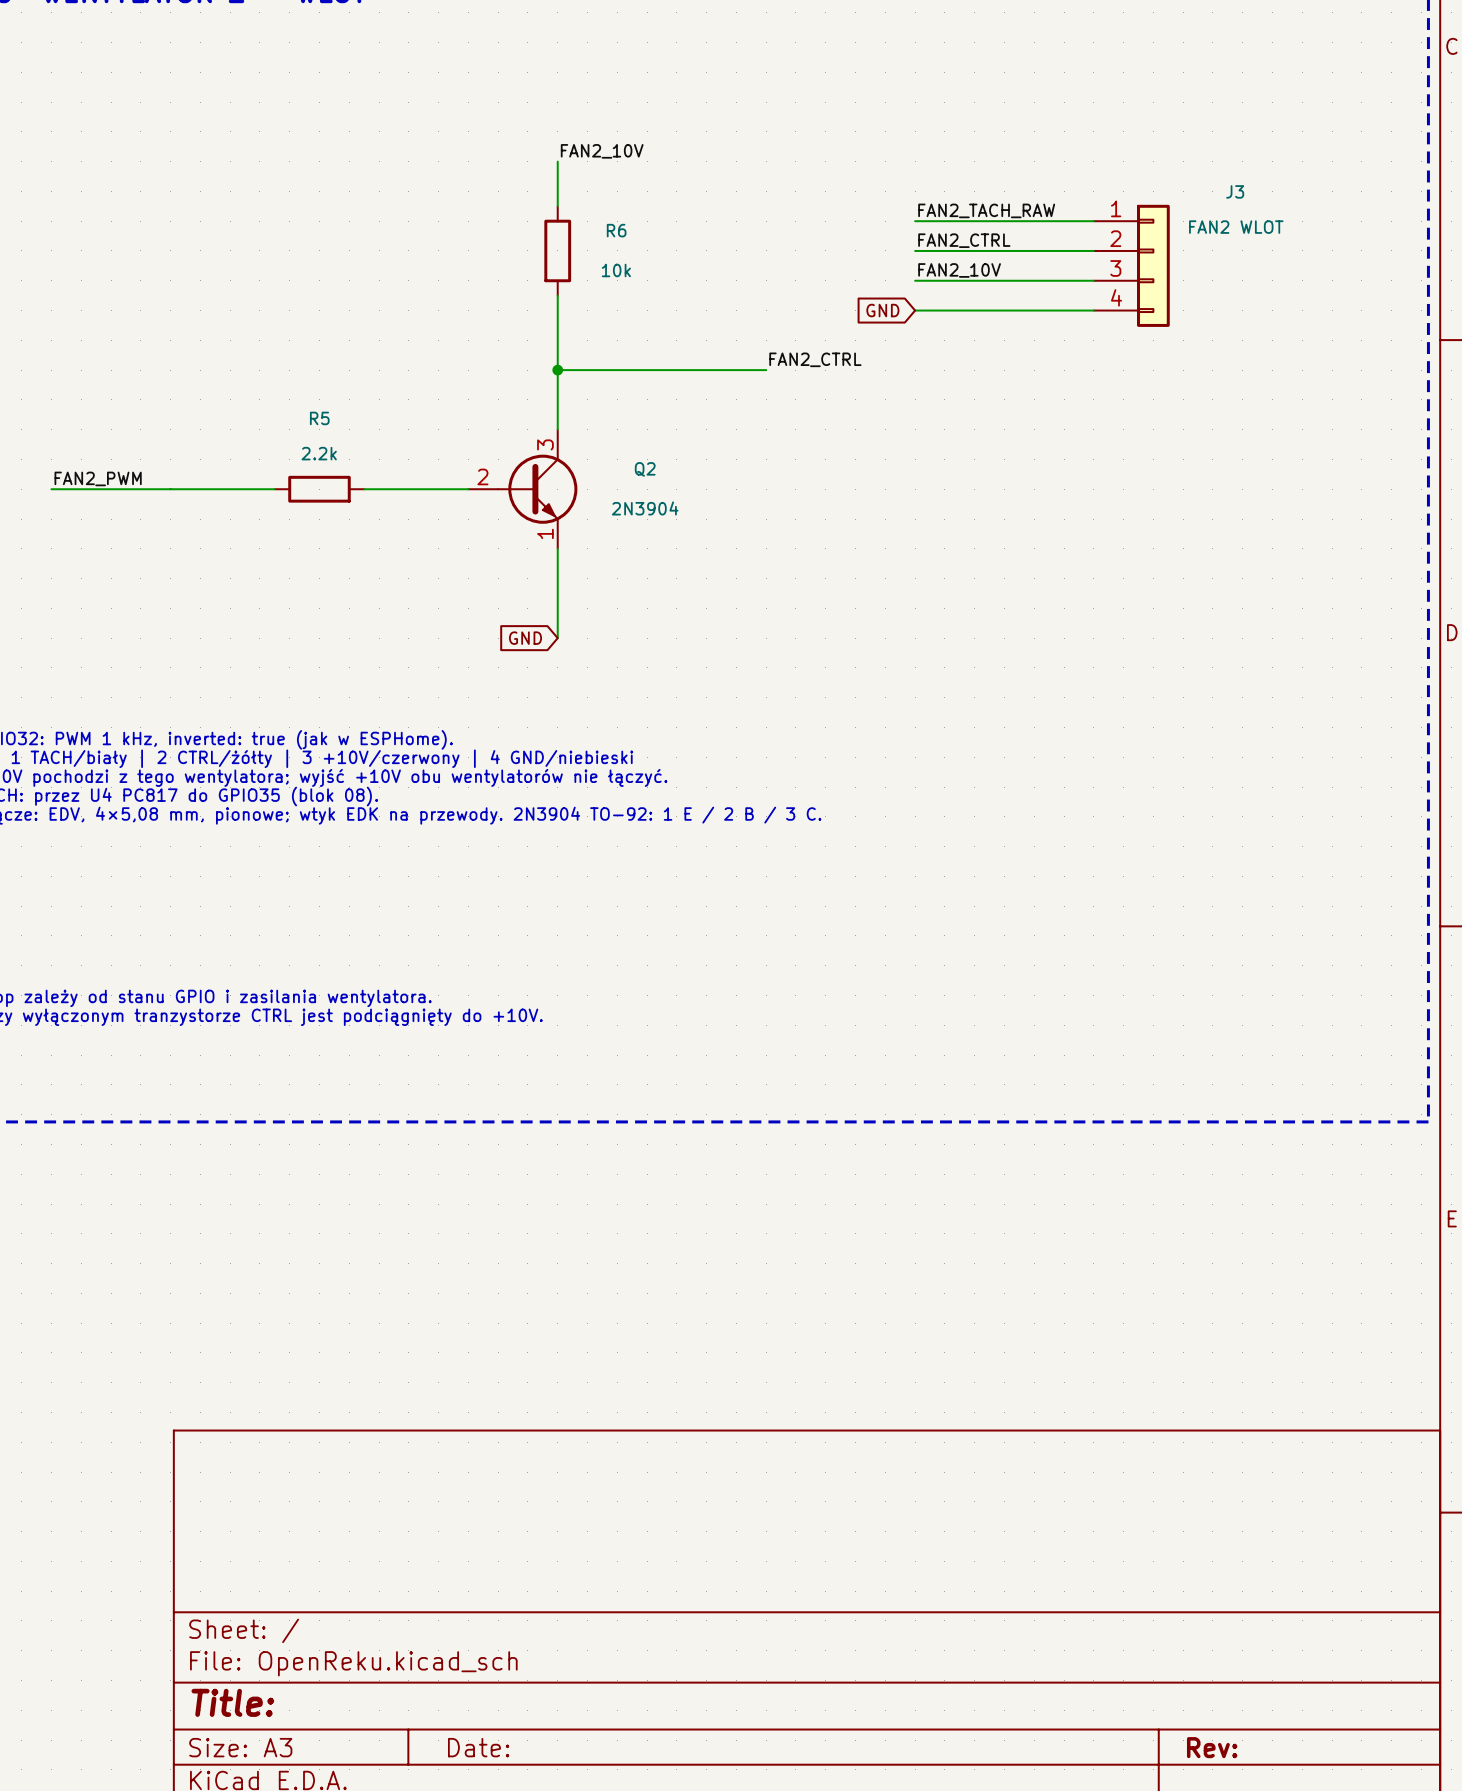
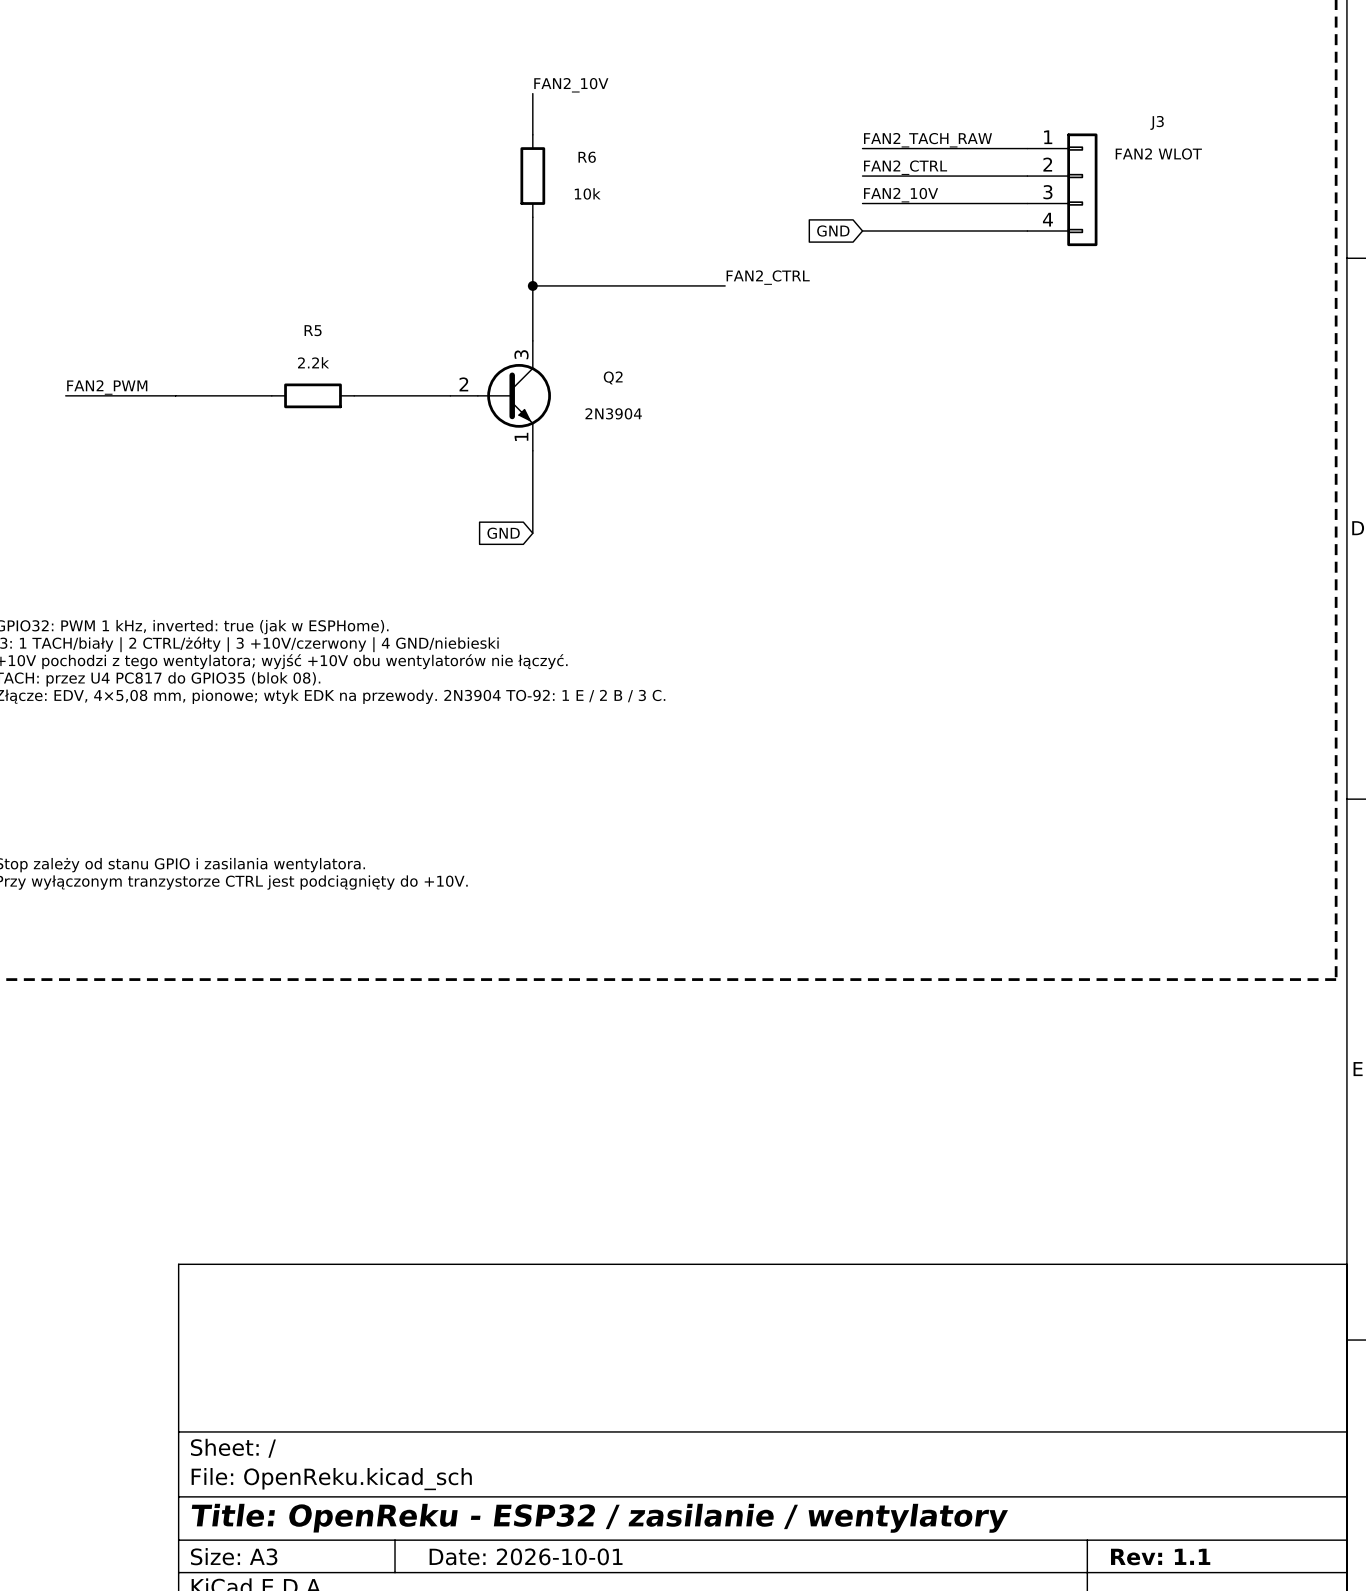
title block: Title: (232, 1702) -> Title: OpenReku - ESP32 / zasilanie / wentylatory (599, 1518)
title block: Date: (478, 1747) -> Date: 2026-10-01 (526, 1556)
title block: Rev: (1212, 1747) -> Rev: 1.1 (1160, 1557)

